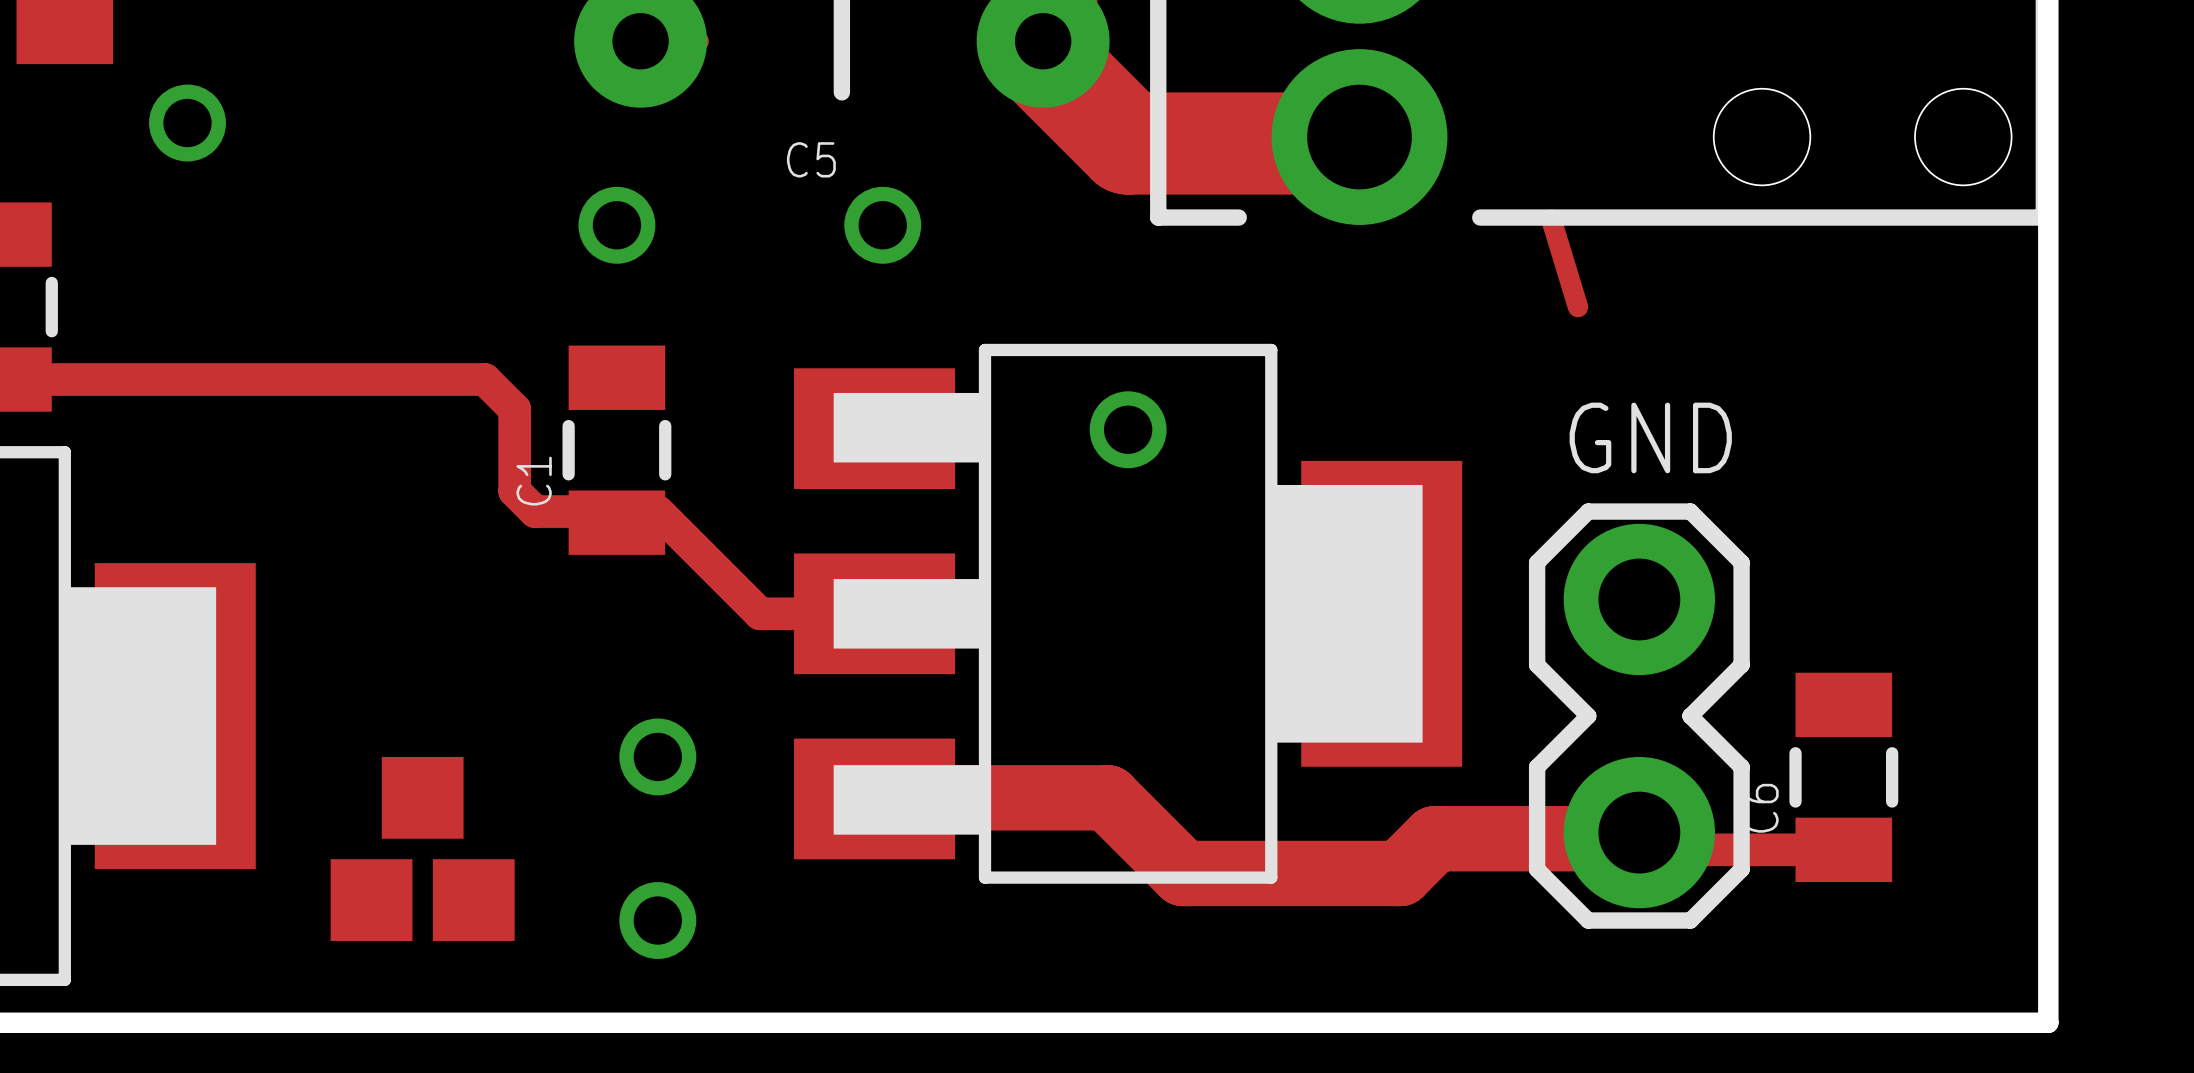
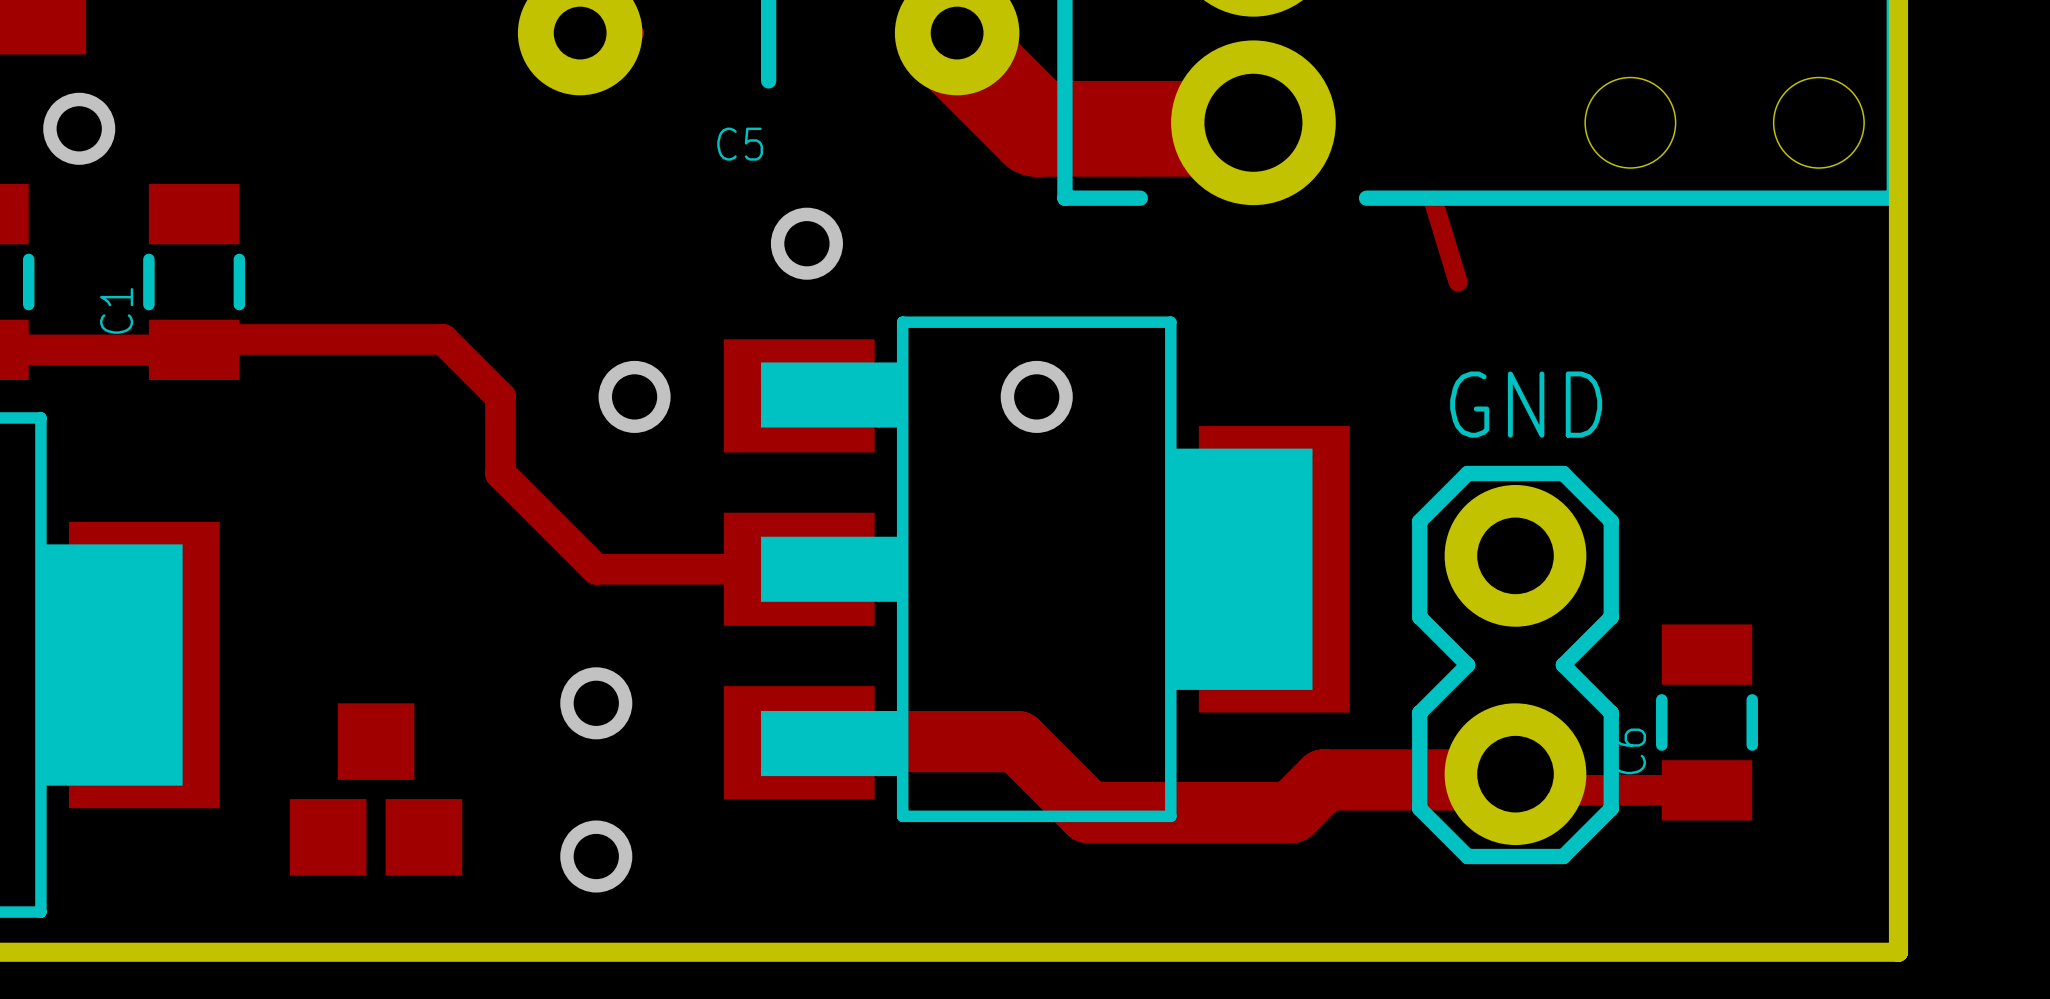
via position: (187, 123) -> (79, 128)
via: (616, 225) -> none
via position: (882, 225) -> (806, 243)
track: (228, 379) (484, 379) (514, 409) (514, 491) (535, 511) (605, 511) (616, 522) -> (194, 349) (202, 339) (443, 339) (500, 396) (500, 473) (596, 569) (692, 569)
via: none -> (634, 396)
C1 position: (616, 450) -> (194, 282)
track: (657, 511) (760, 613) -> none

